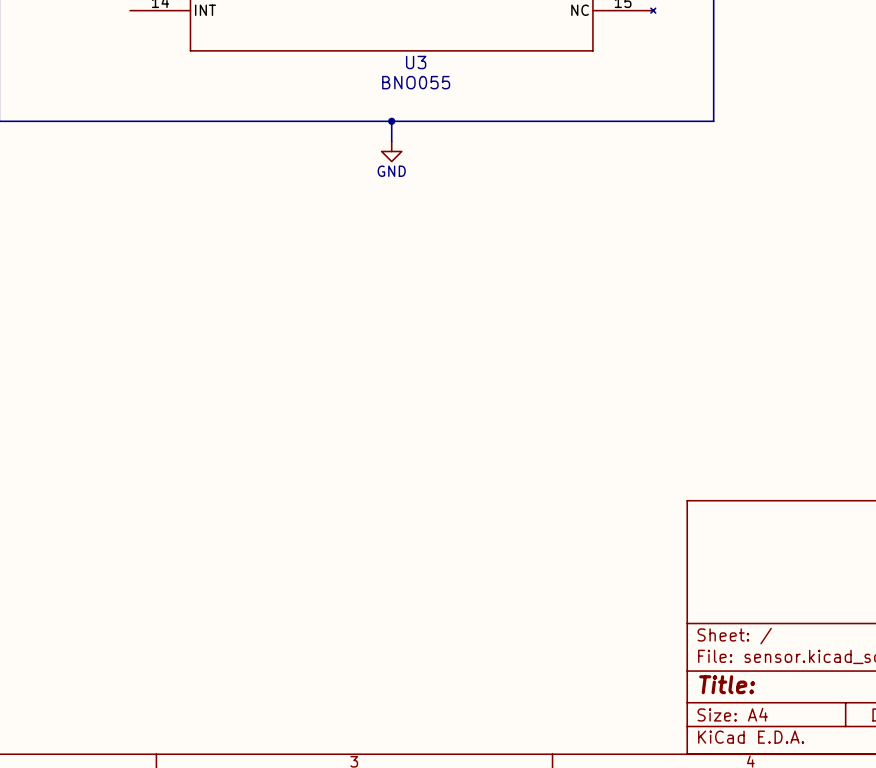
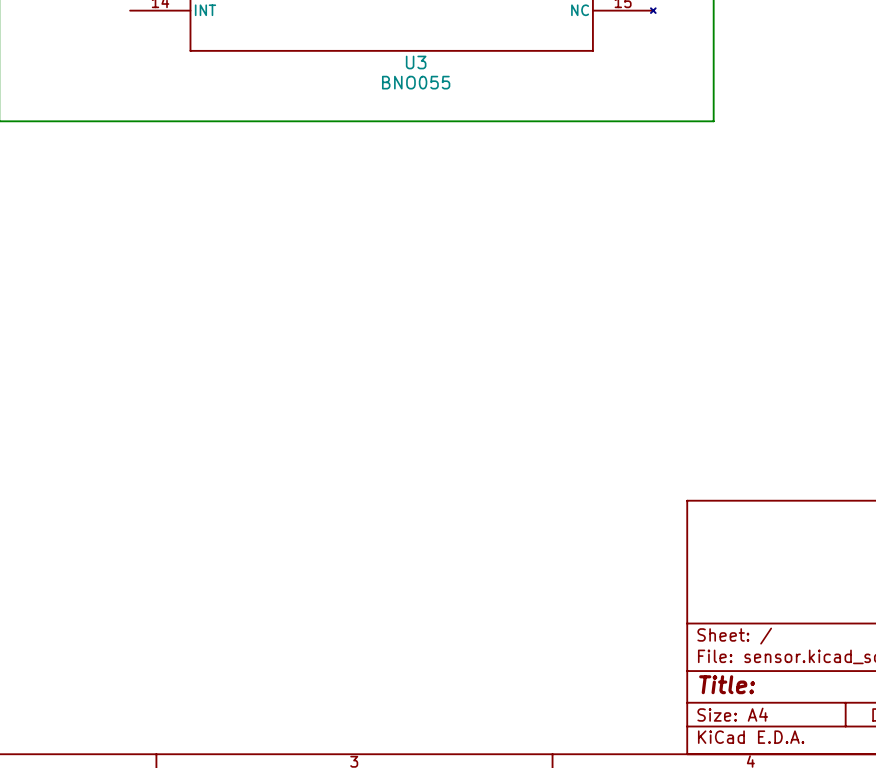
wire: (391, 121) (391, 141) -> none
junction: (391, 121) -> none
power symbol: GND (391, 151) -> none

